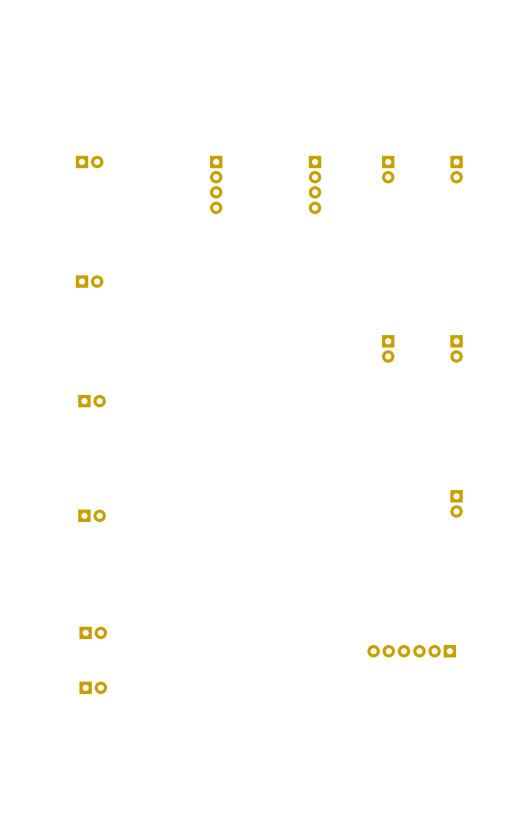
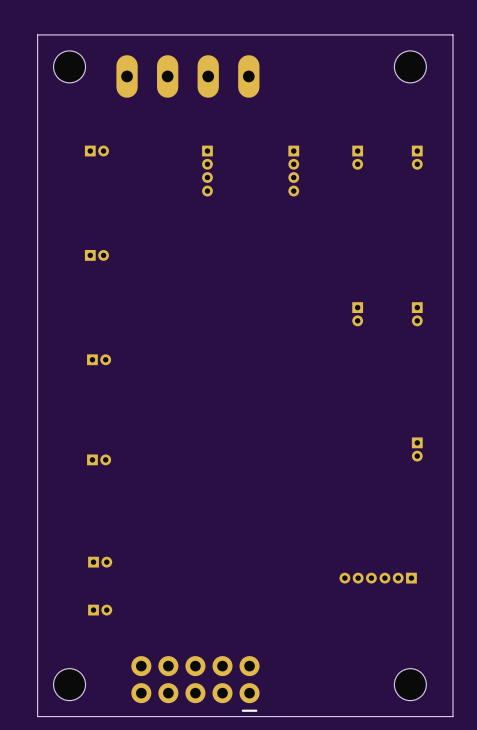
board edge: none -> (452, 34) (37, 34) (37, 716) (452, 716) (452, 34)
hole: none -> (69, 66)
hole: none -> (410, 66)
part: none -> (187, 76)
part: none -> (195, 683)
hole: none -> (69, 684)
hole: none -> (410, 684)

